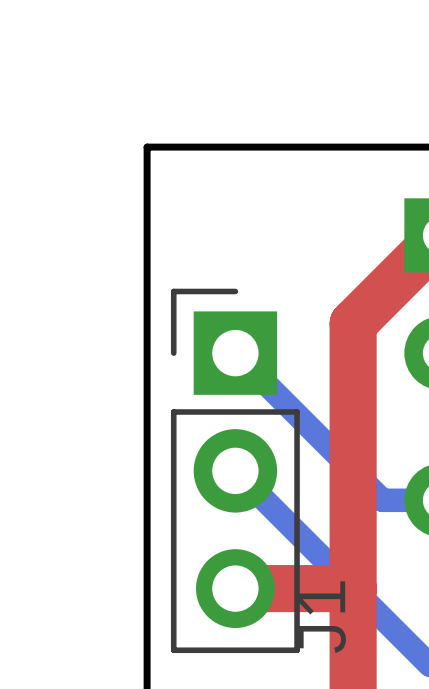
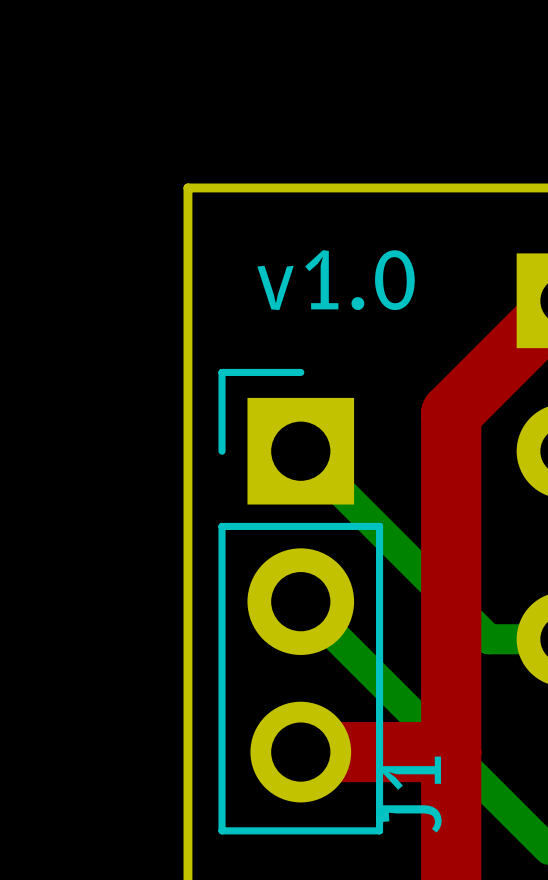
text: none -> v1.0 (336, 280)

